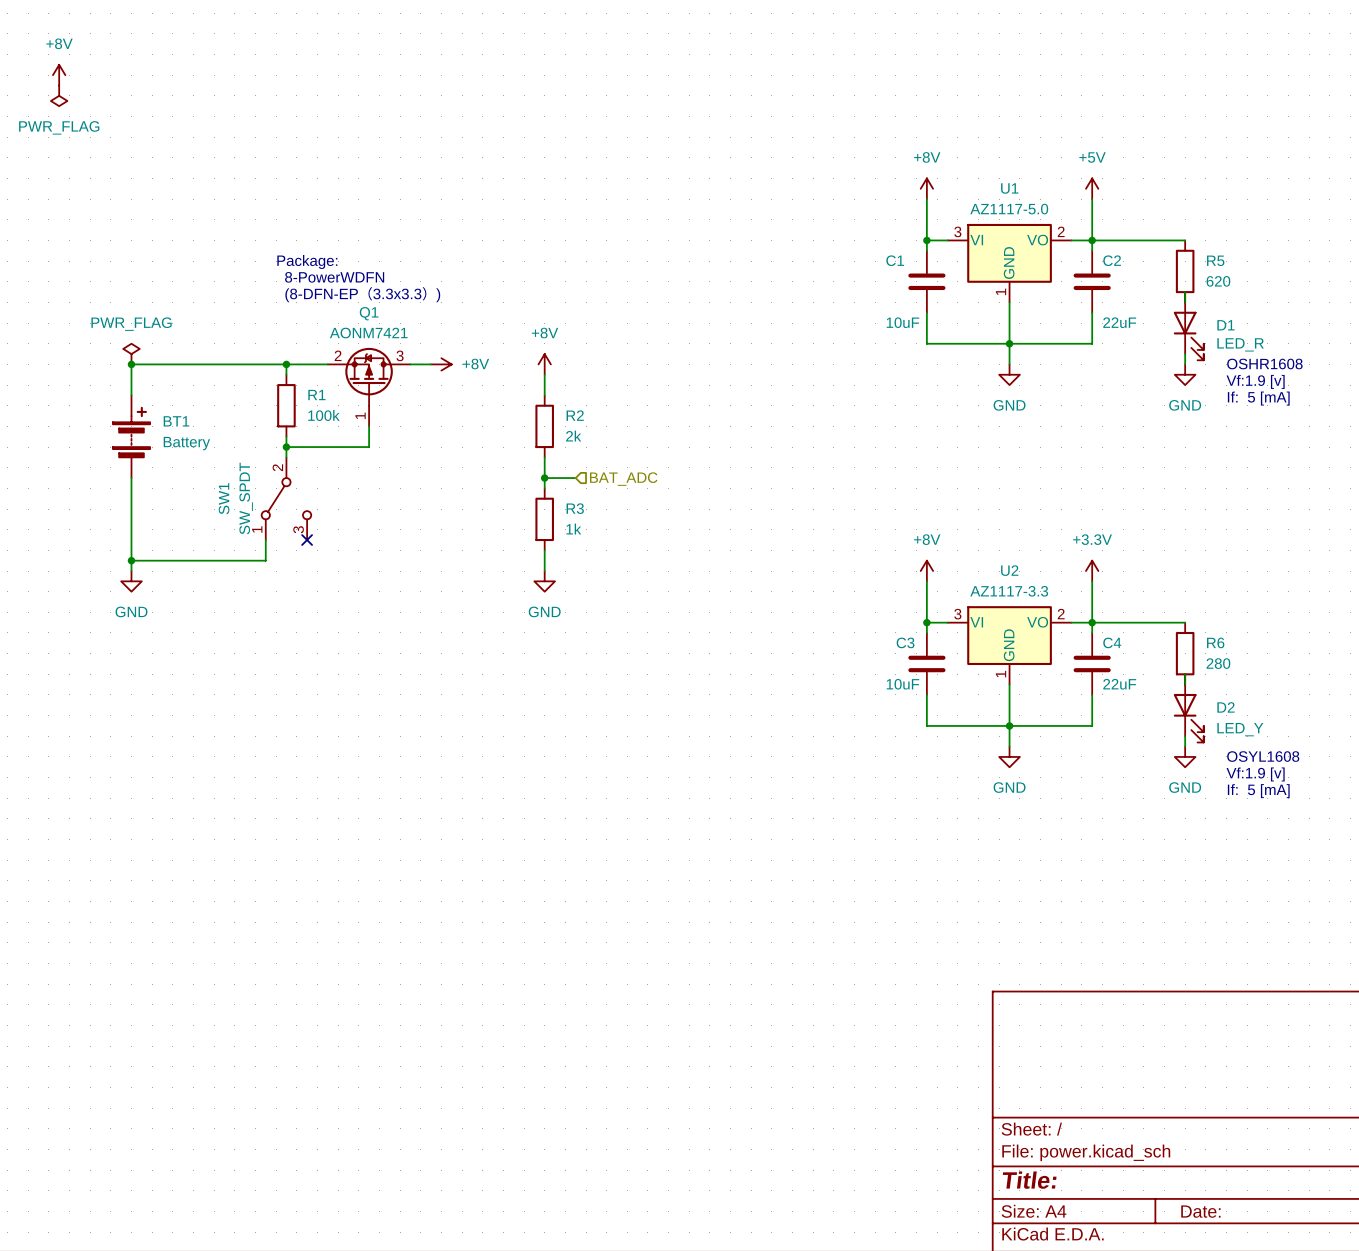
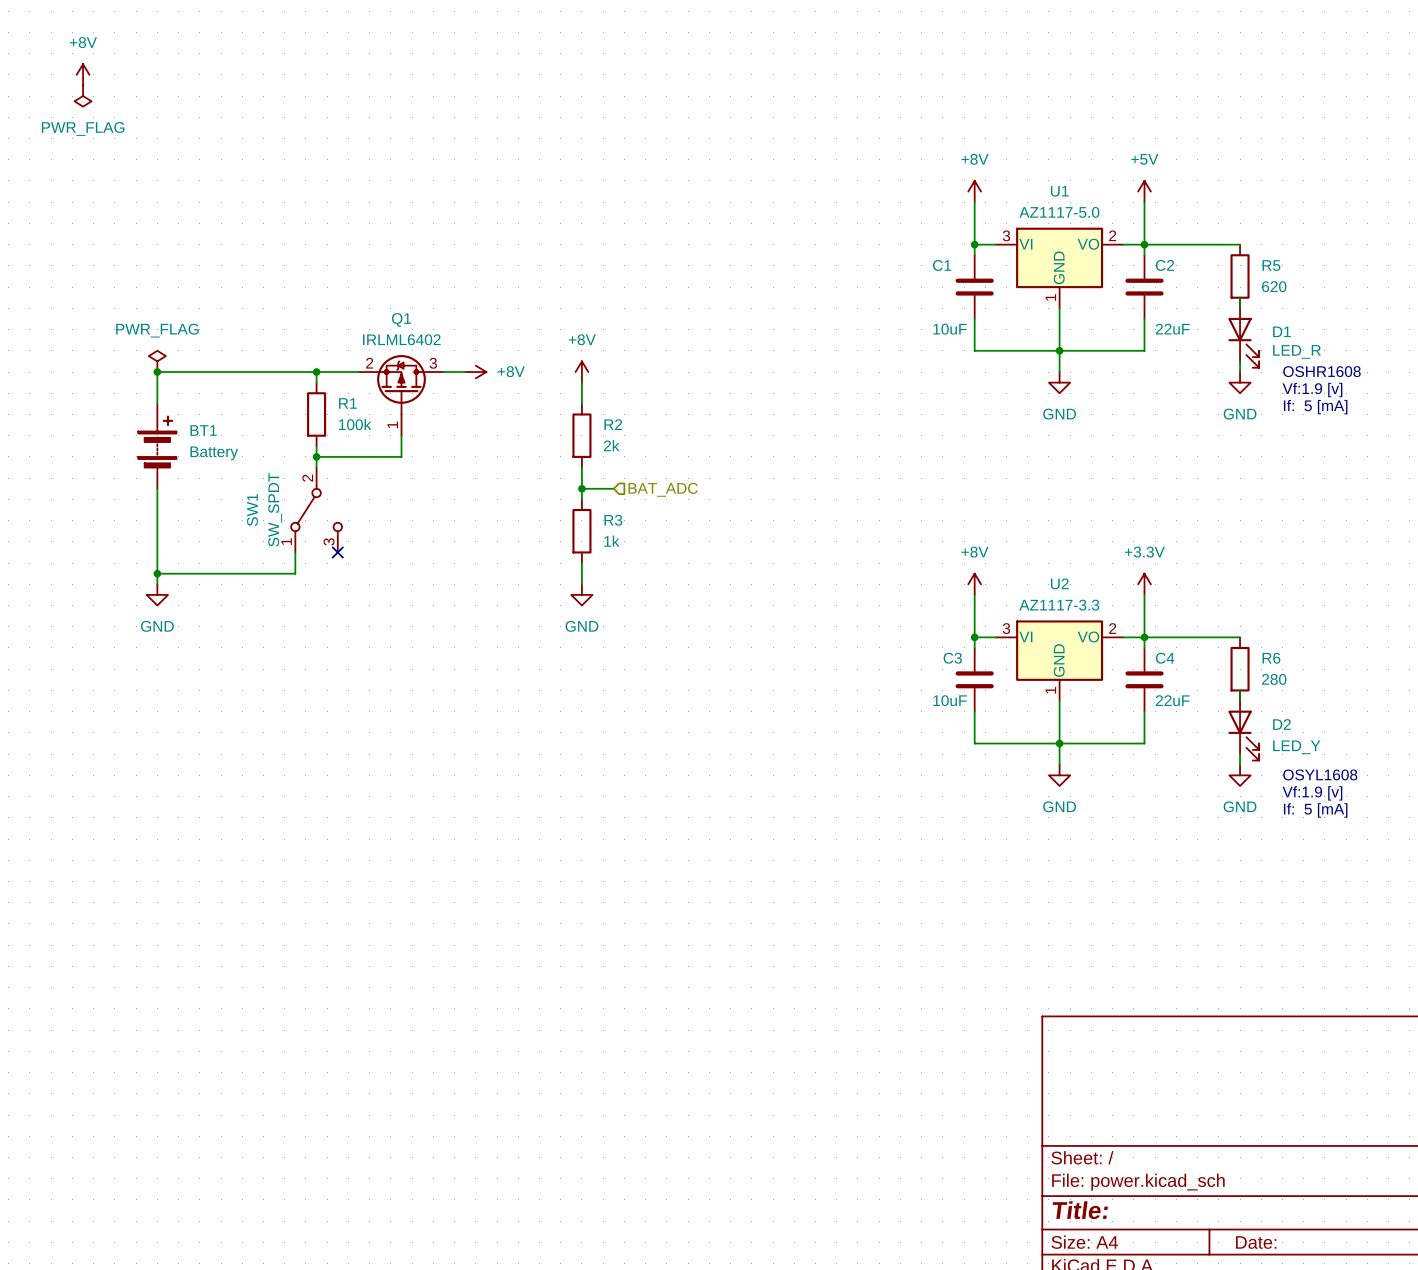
text: Package: (307, 261) -> none
text: 8-PowerWDFN (334, 277) -> none
text: (8-DFN-EP（3.3x3.3）) (362, 294) -> none
Q1 value: AONM7421 (368, 333) -> IRLML6402 (401, 339)

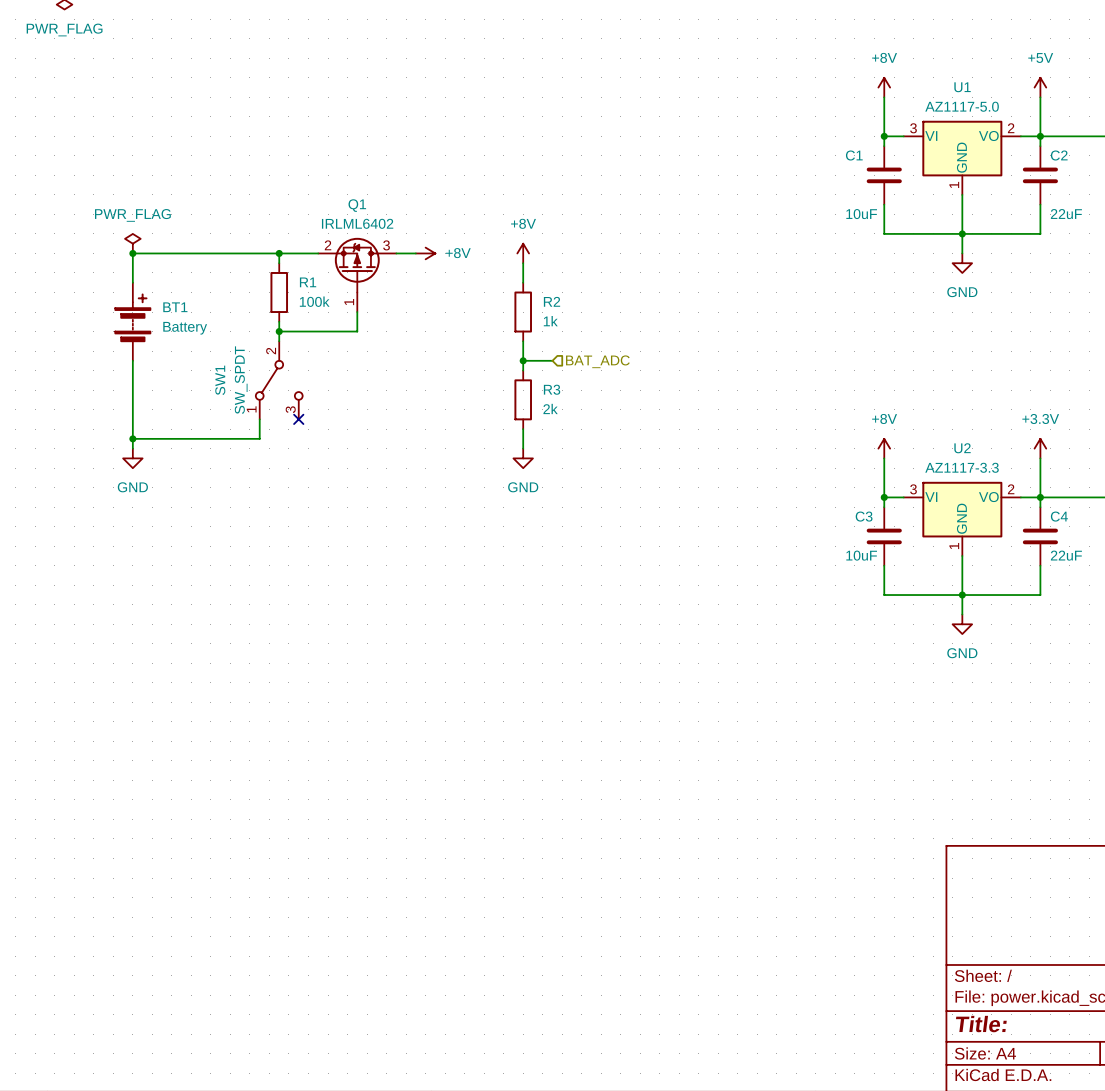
R2 value: 2k (611, 445) -> 1k (550, 321)
R3 value: 1k (611, 541) -> 2k (550, 408)

